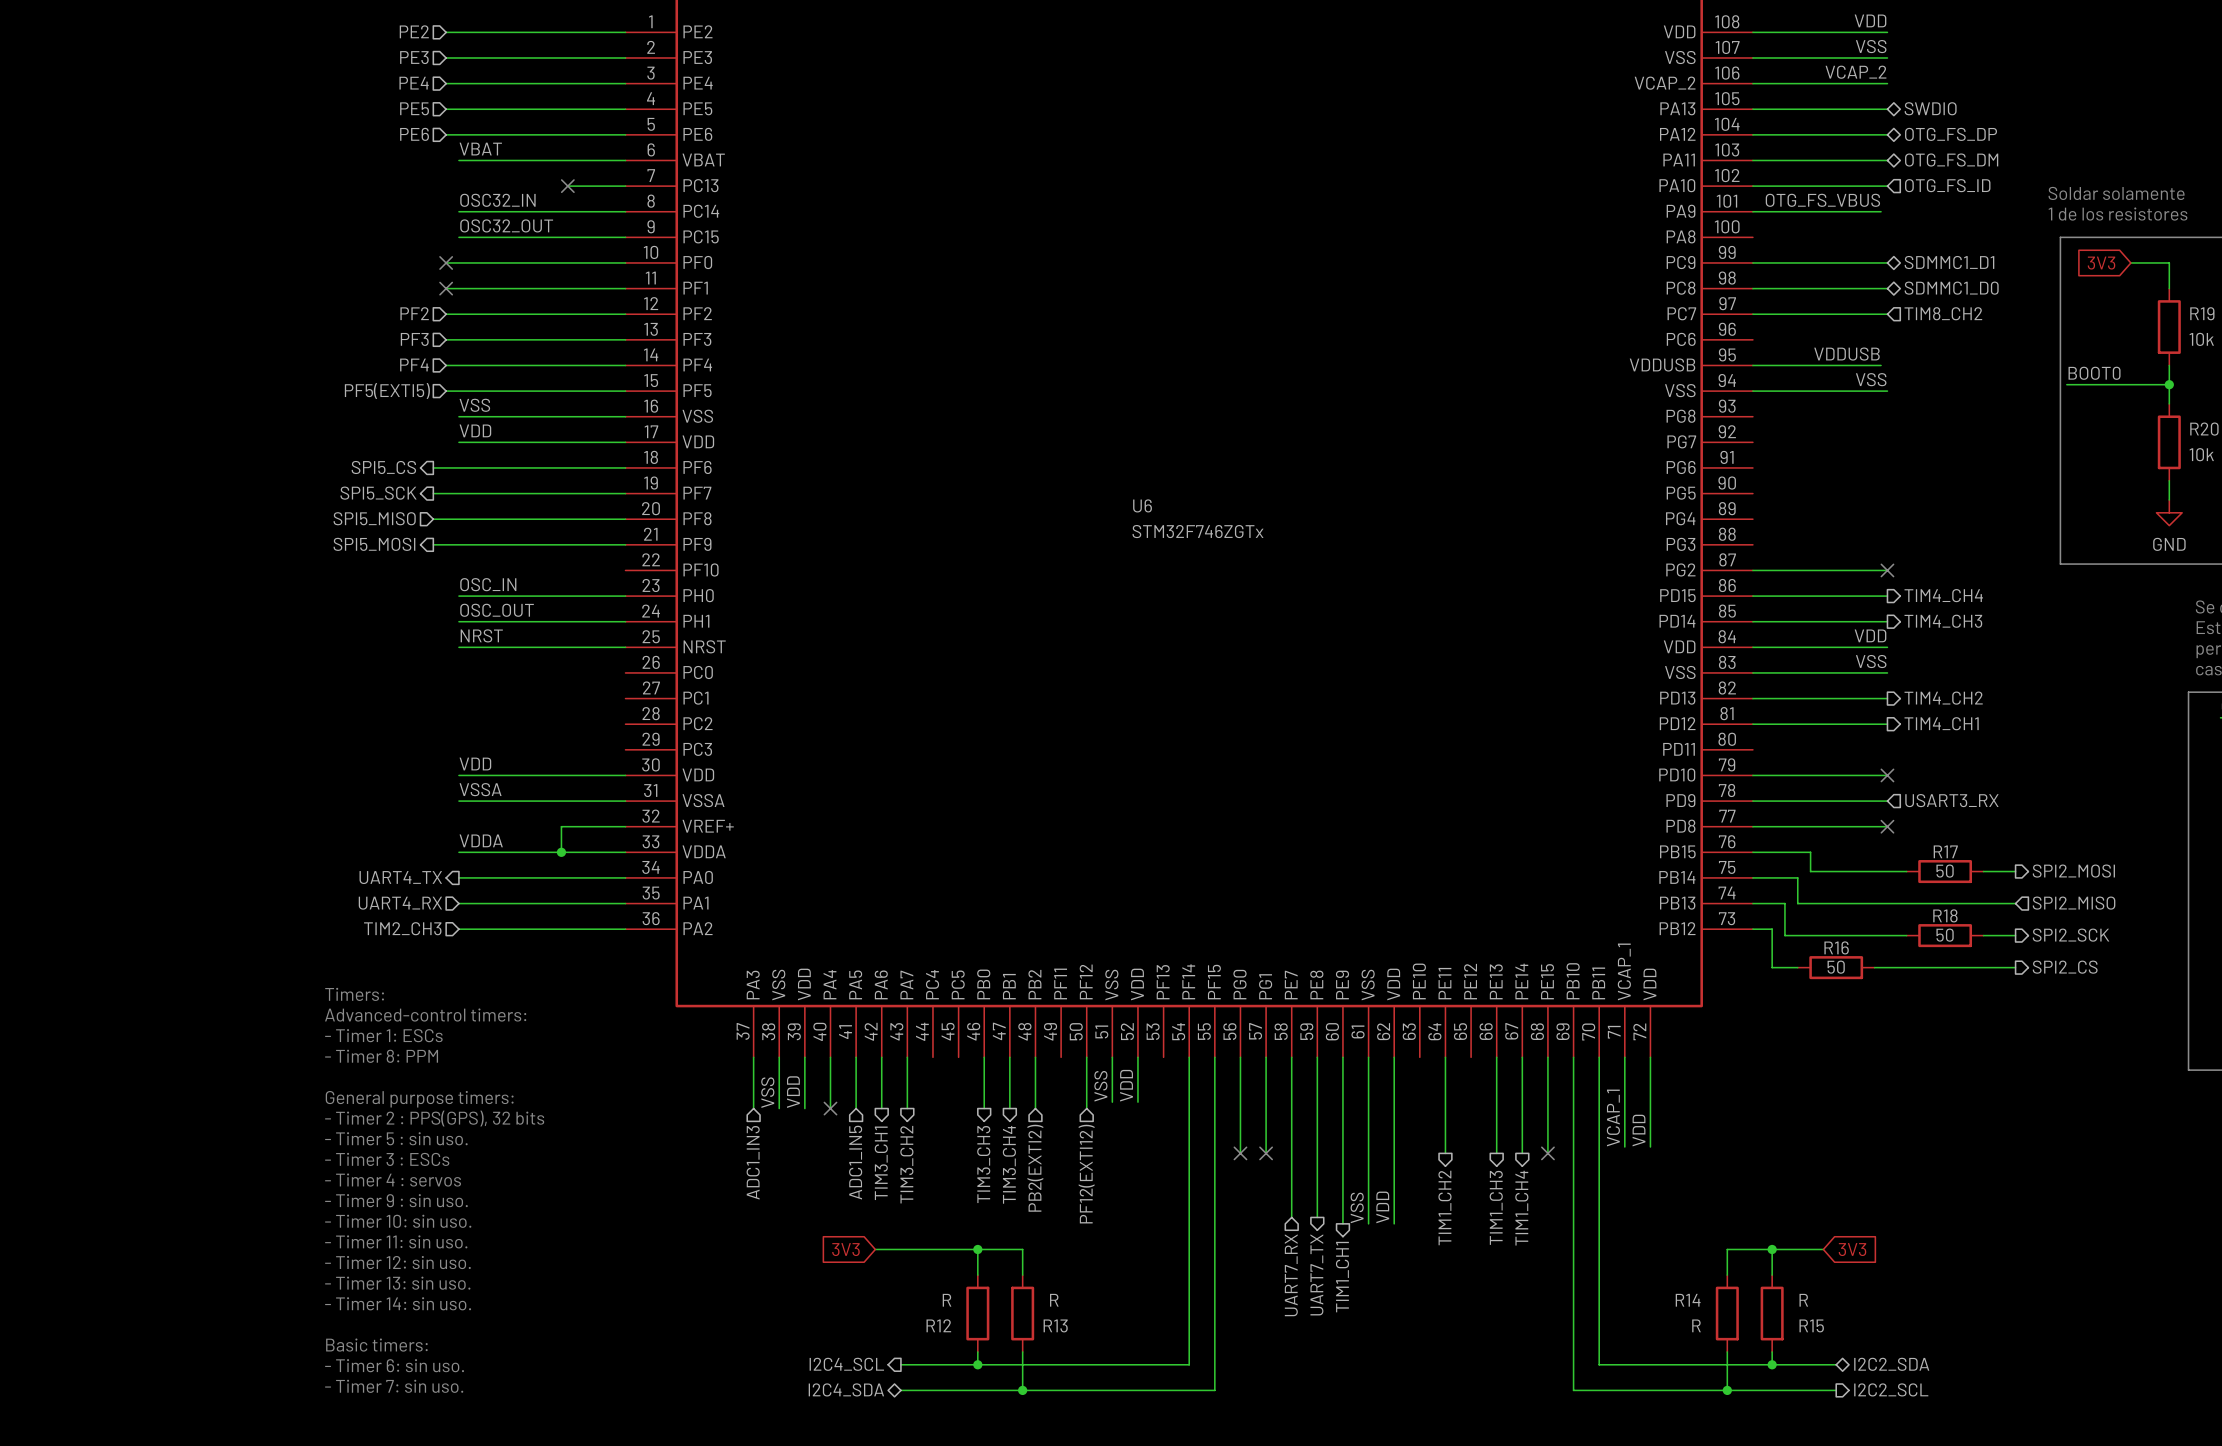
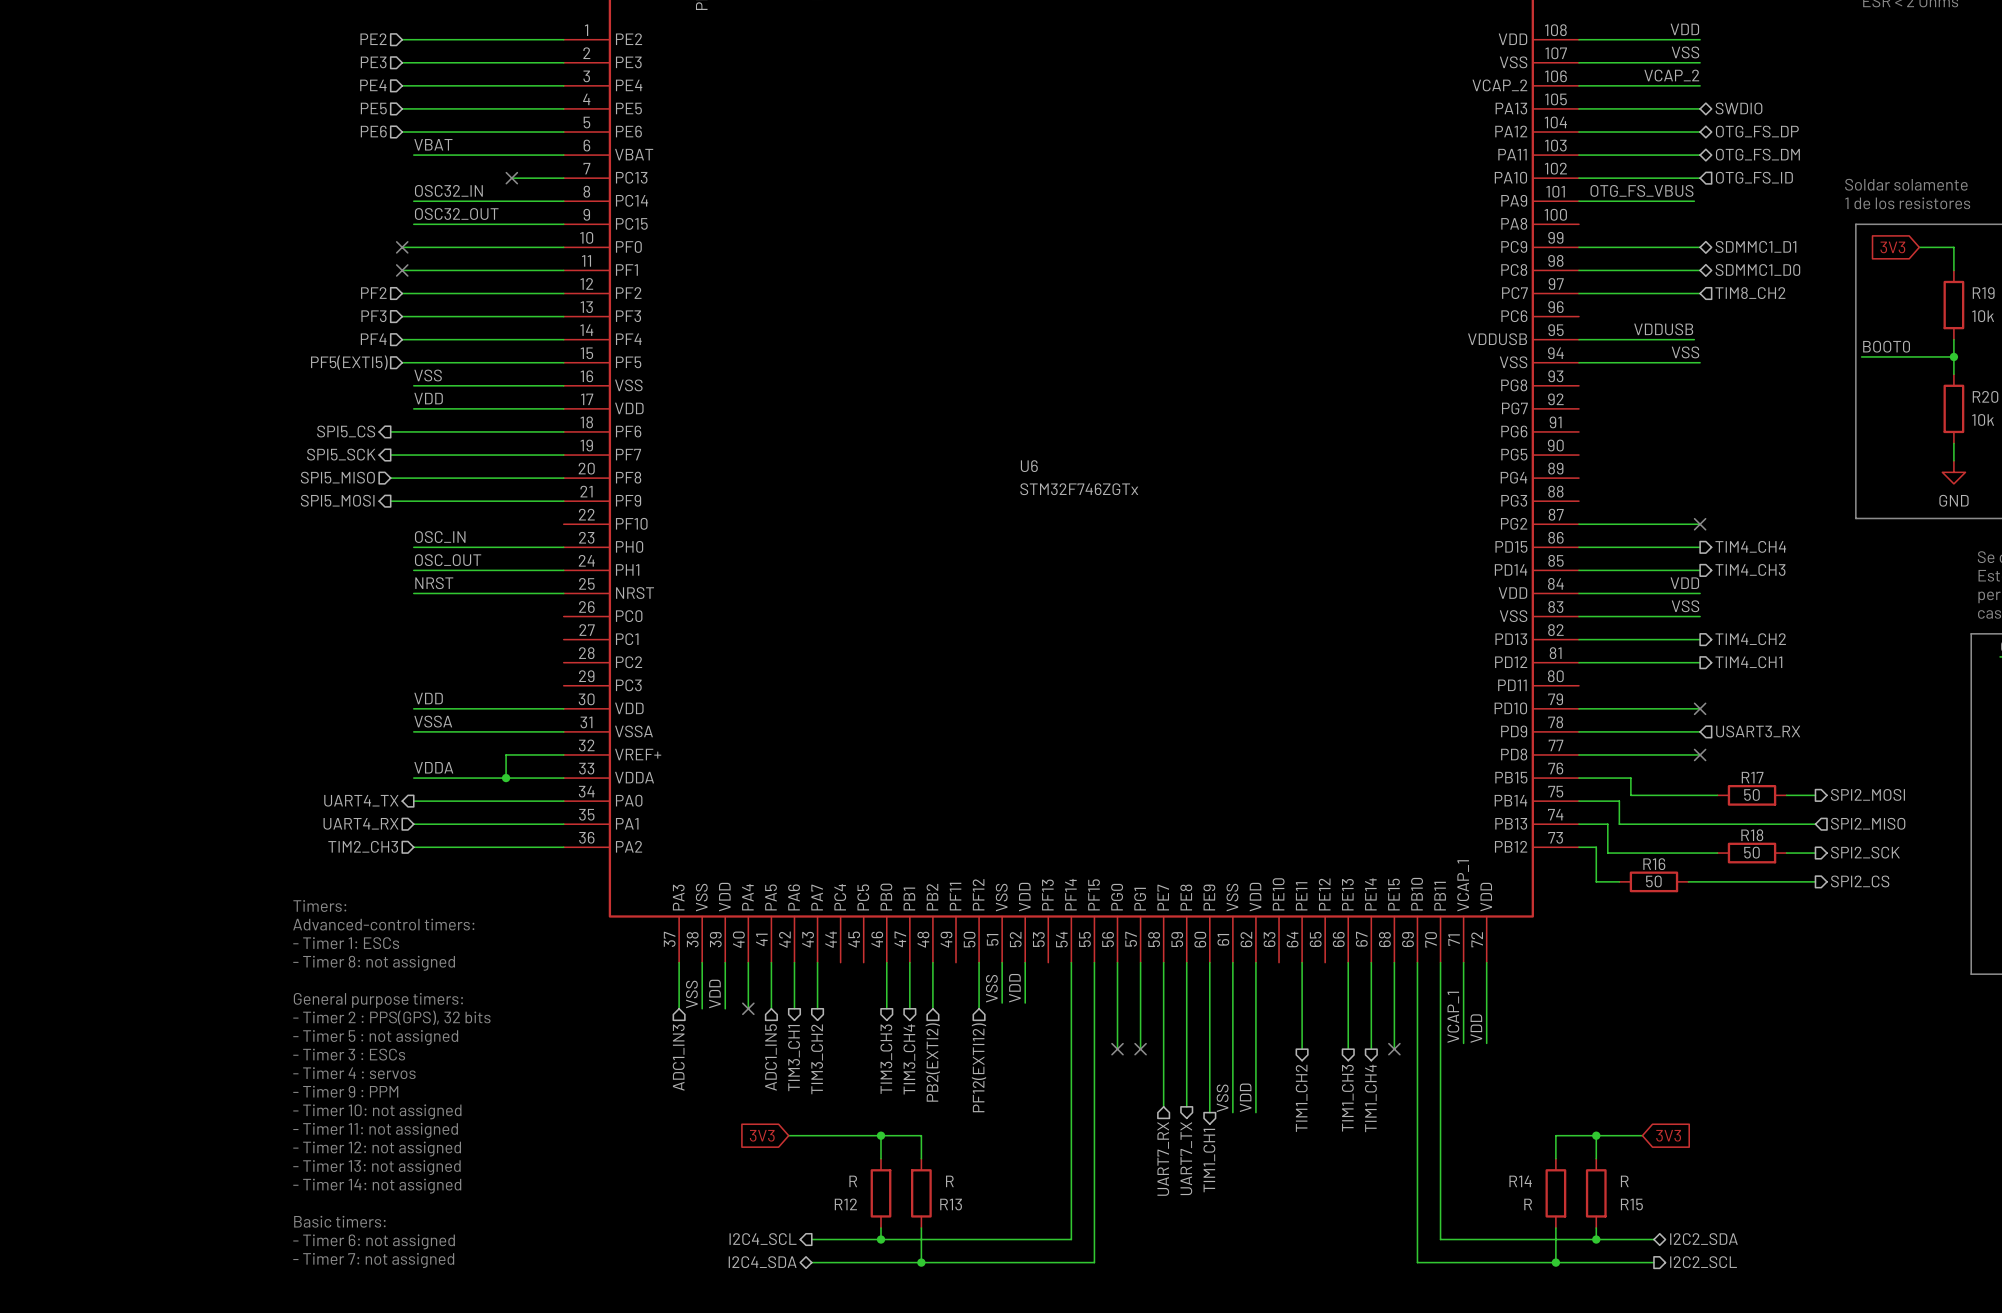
text: - Timer 8: PPM (381, 1056) -> - Timer 8: not assigned (374, 963)
text: - Timer 5 : sin uso. (396, 1138) -> - Timer 5 : not assigned (375, 1037)
text: - Timer 9 : sin uso. (396, 1200) -> - Timer 9 : PPM (345, 1091)
text: - Timer 10: sin uso. (398, 1221) -> - Timer 10: not assigned (377, 1111)
text: - Timer 11: sin uso. (396, 1241) -> - Timer 11: not assigned (375, 1130)
text: - Timer 12: sin uso. (397, 1262) -> - Timer 12: not assigned (377, 1149)
text: - Timer 13: sin uso. (397, 1283) -> - Timer 13: not assigned (376, 1167)
text: - Timer 14: sin uso. (398, 1303) -> - Timer 14: not assigned (377, 1186)
text: - Timer 6: sin uso. (394, 1365) -> - Timer 6: not assigned (374, 1241)
text: - Timer 7: sin uso. (394, 1386) -> - Timer 7: not assigned (373, 1260)

